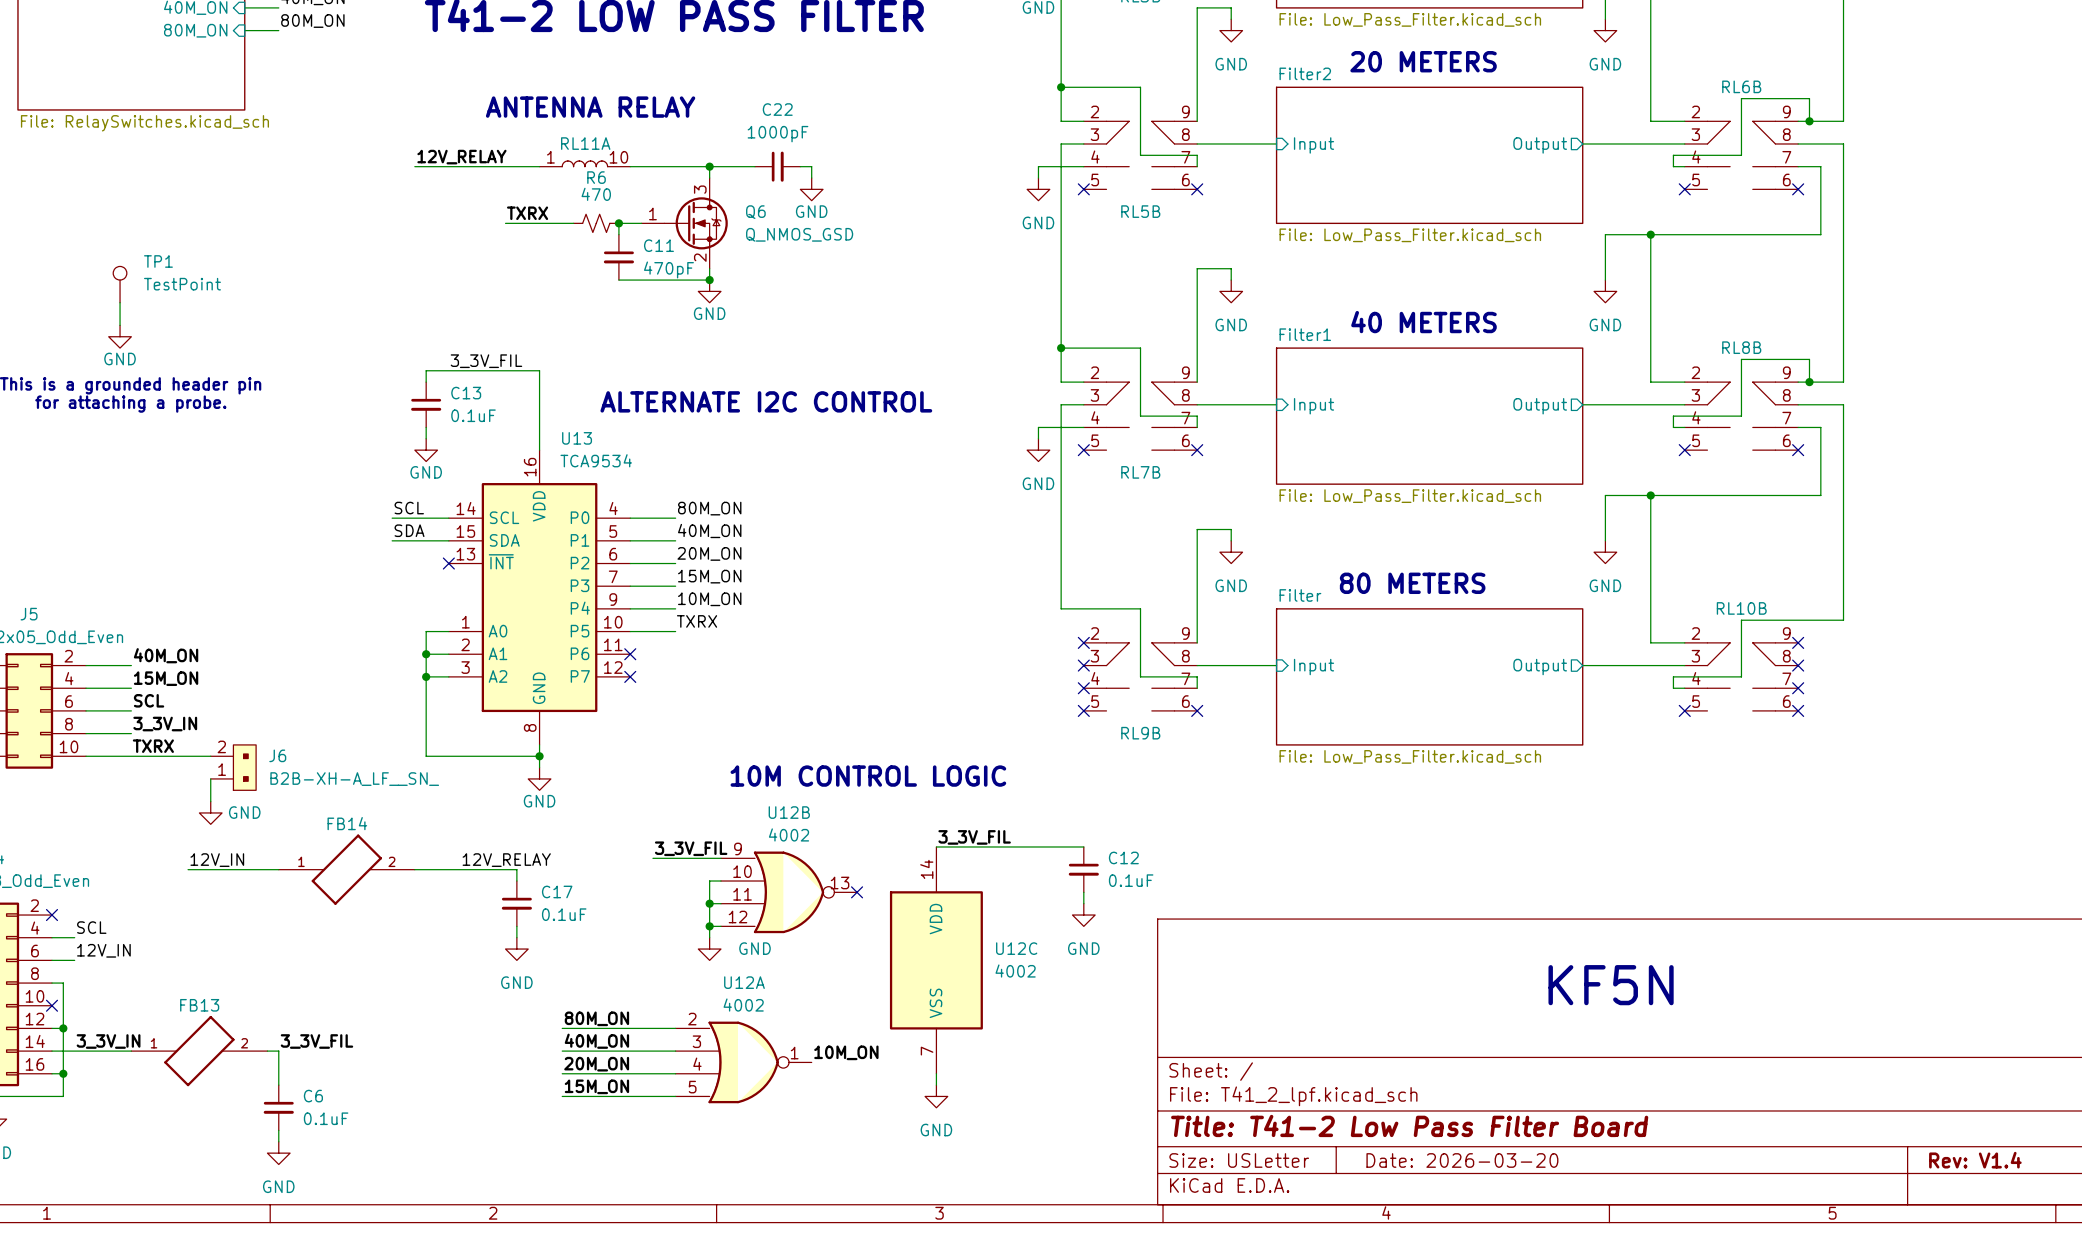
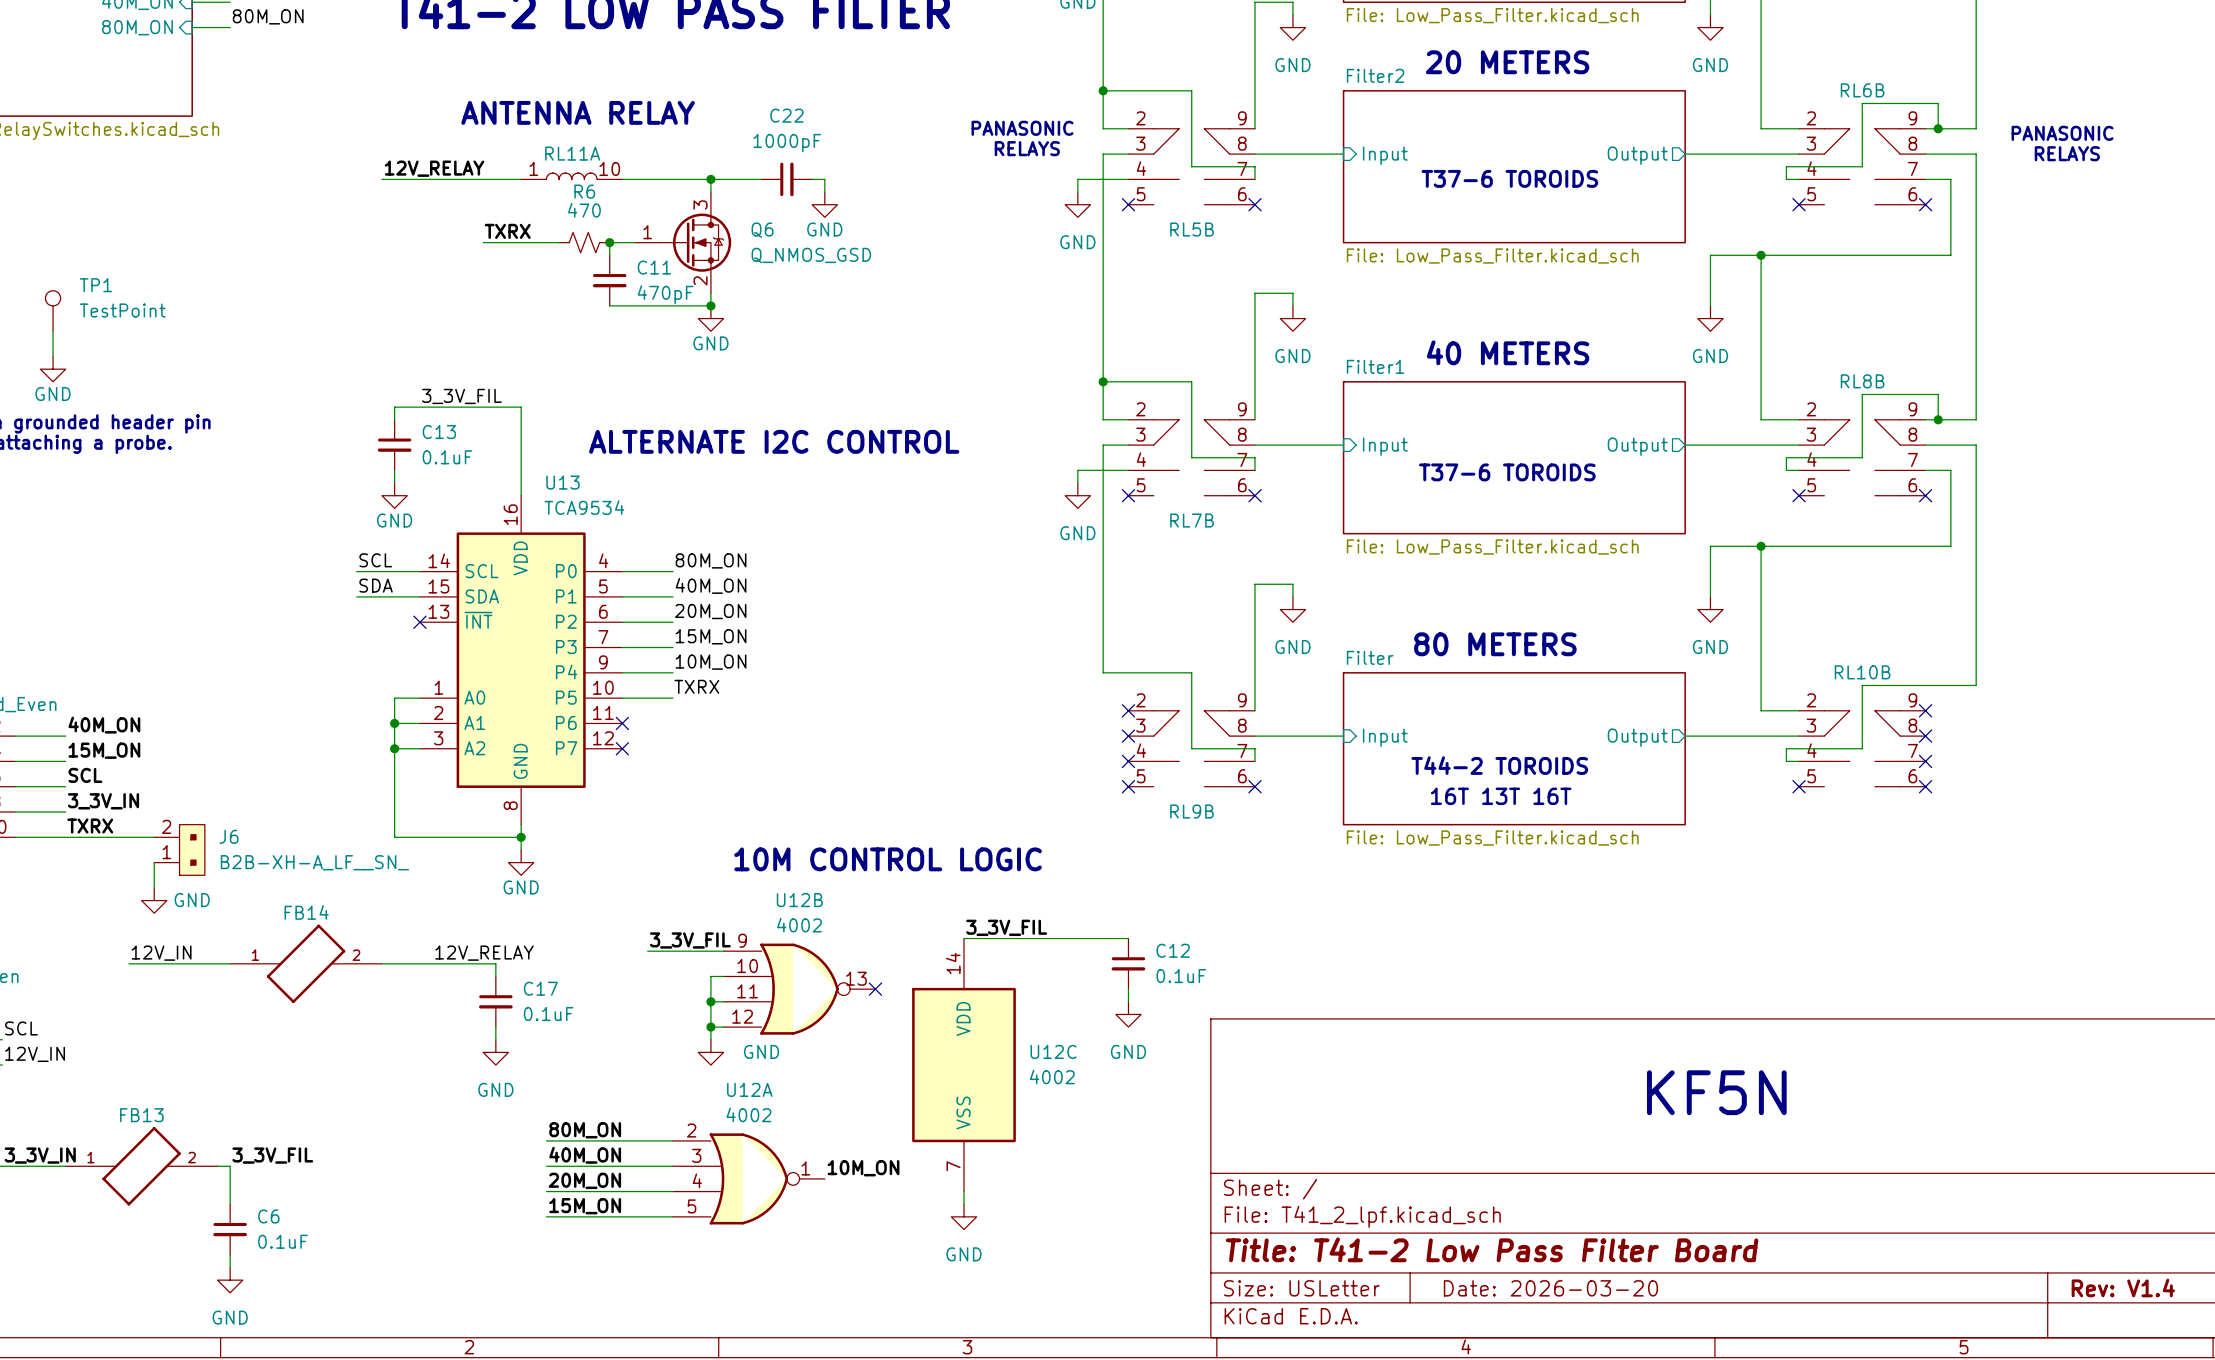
text: none -> PANASONIC (1022, 128)
text: none -> PANASONIC (2062, 133)
text: none -> RELAYS (1027, 148)
text: none -> RELAYS (2067, 153)
text: none -> T37-6 TOROIDS (1509, 178)
text: none -> T37-6 TOROIDS (1507, 472)
text: none -> T44-2 TOROIDS (1499, 765)
text: none -> 16T 13T 16T (1501, 796)

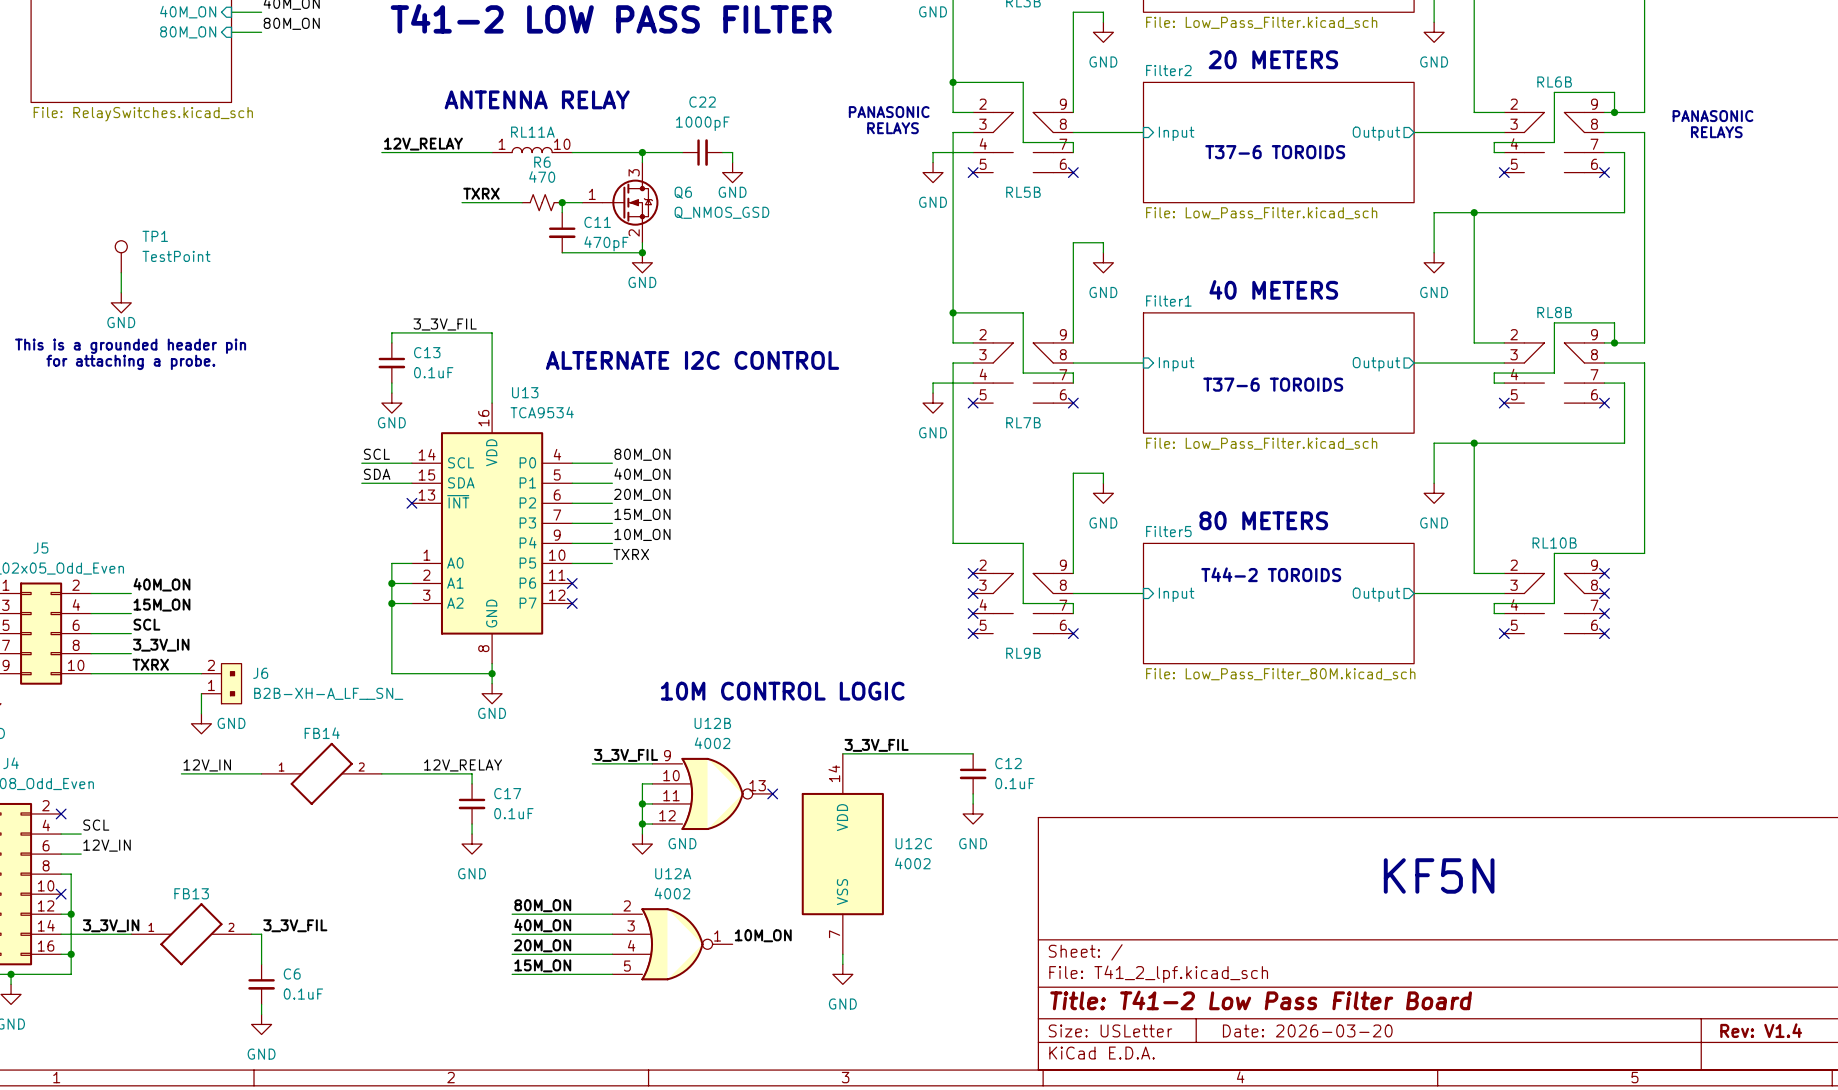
sheet Filter name: Filter (1370, 657) -> Filter5 (1168, 531)
text position: T44-2 TOROIDS (1499, 765) -> T44-2 TOROIDS (1271, 574)
text: 16T 13T 16T (1501, 796) -> none
sheet Filter value: File: Low_Pass_Filter.kicad_sch (1492, 838) -> File: Low_Pass_Filter_80M.kicad_sch (1280, 674)

